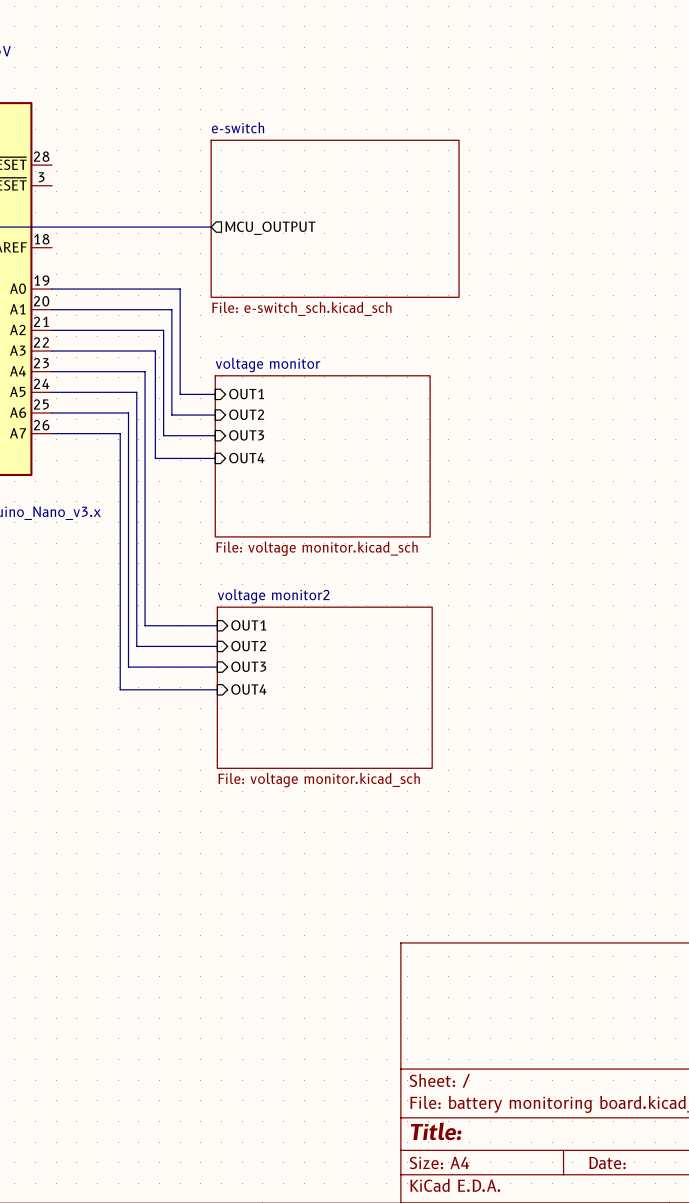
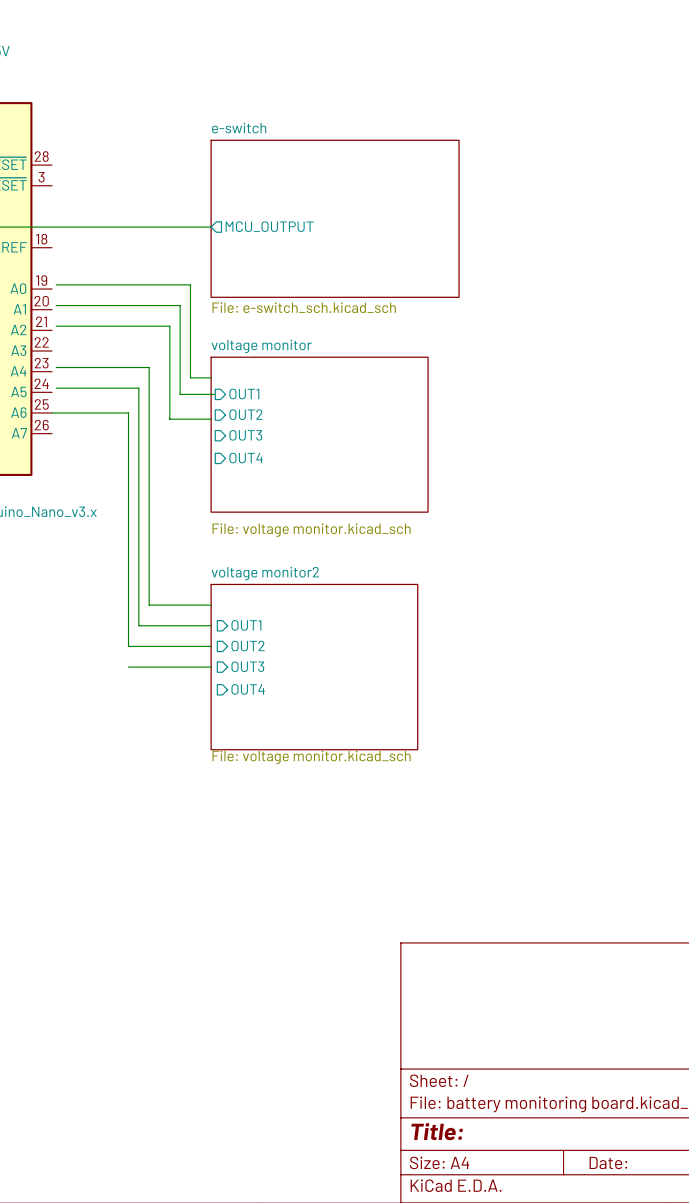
wire: none -> (56, 284) (190, 284) (190, 377) (211, 377)
wire: (52, 289) (180, 289) (180, 305) -> (56, 305) (180, 305)
wire: (52, 309) (171, 309) (171, 415) (215, 415) -> none
wire: none -> (56, 326) (169, 326) (169, 419) (211, 419)
wire: (52, 330) (163, 330) (163, 435) (215, 435) -> none
wire: (52, 351) (155, 351) (155, 458) (215, 458) -> none
wire: none -> (56, 367) (149, 367) (149, 605) (211, 605)
wire: (52, 371) (145, 371) (145, 625) -> (56, 388) (138, 388) (138, 625) (145, 625)
wire: (52, 392) (136, 392) (136, 646) -> none
wire: (52, 433) (120, 433) (120, 689) (217, 689) -> none
sheet voltage monitor: none -> File: voltage monitor.kicad_sch (319, 434)
sheet voltage monitor: File: voltage monitor.kicad_sch (322, 456) -> none
sheet voltage monitor2 shape: [216, 606, 433, 769] -> [210, 583, 419, 751]
wire: (211, 625) (217, 625) -> none
wire: (128, 646) (128, 667) -> (128, 646) (136, 646)
wire: (211, 646) (217, 646) -> none
wire: (211, 667) (217, 667) -> none

